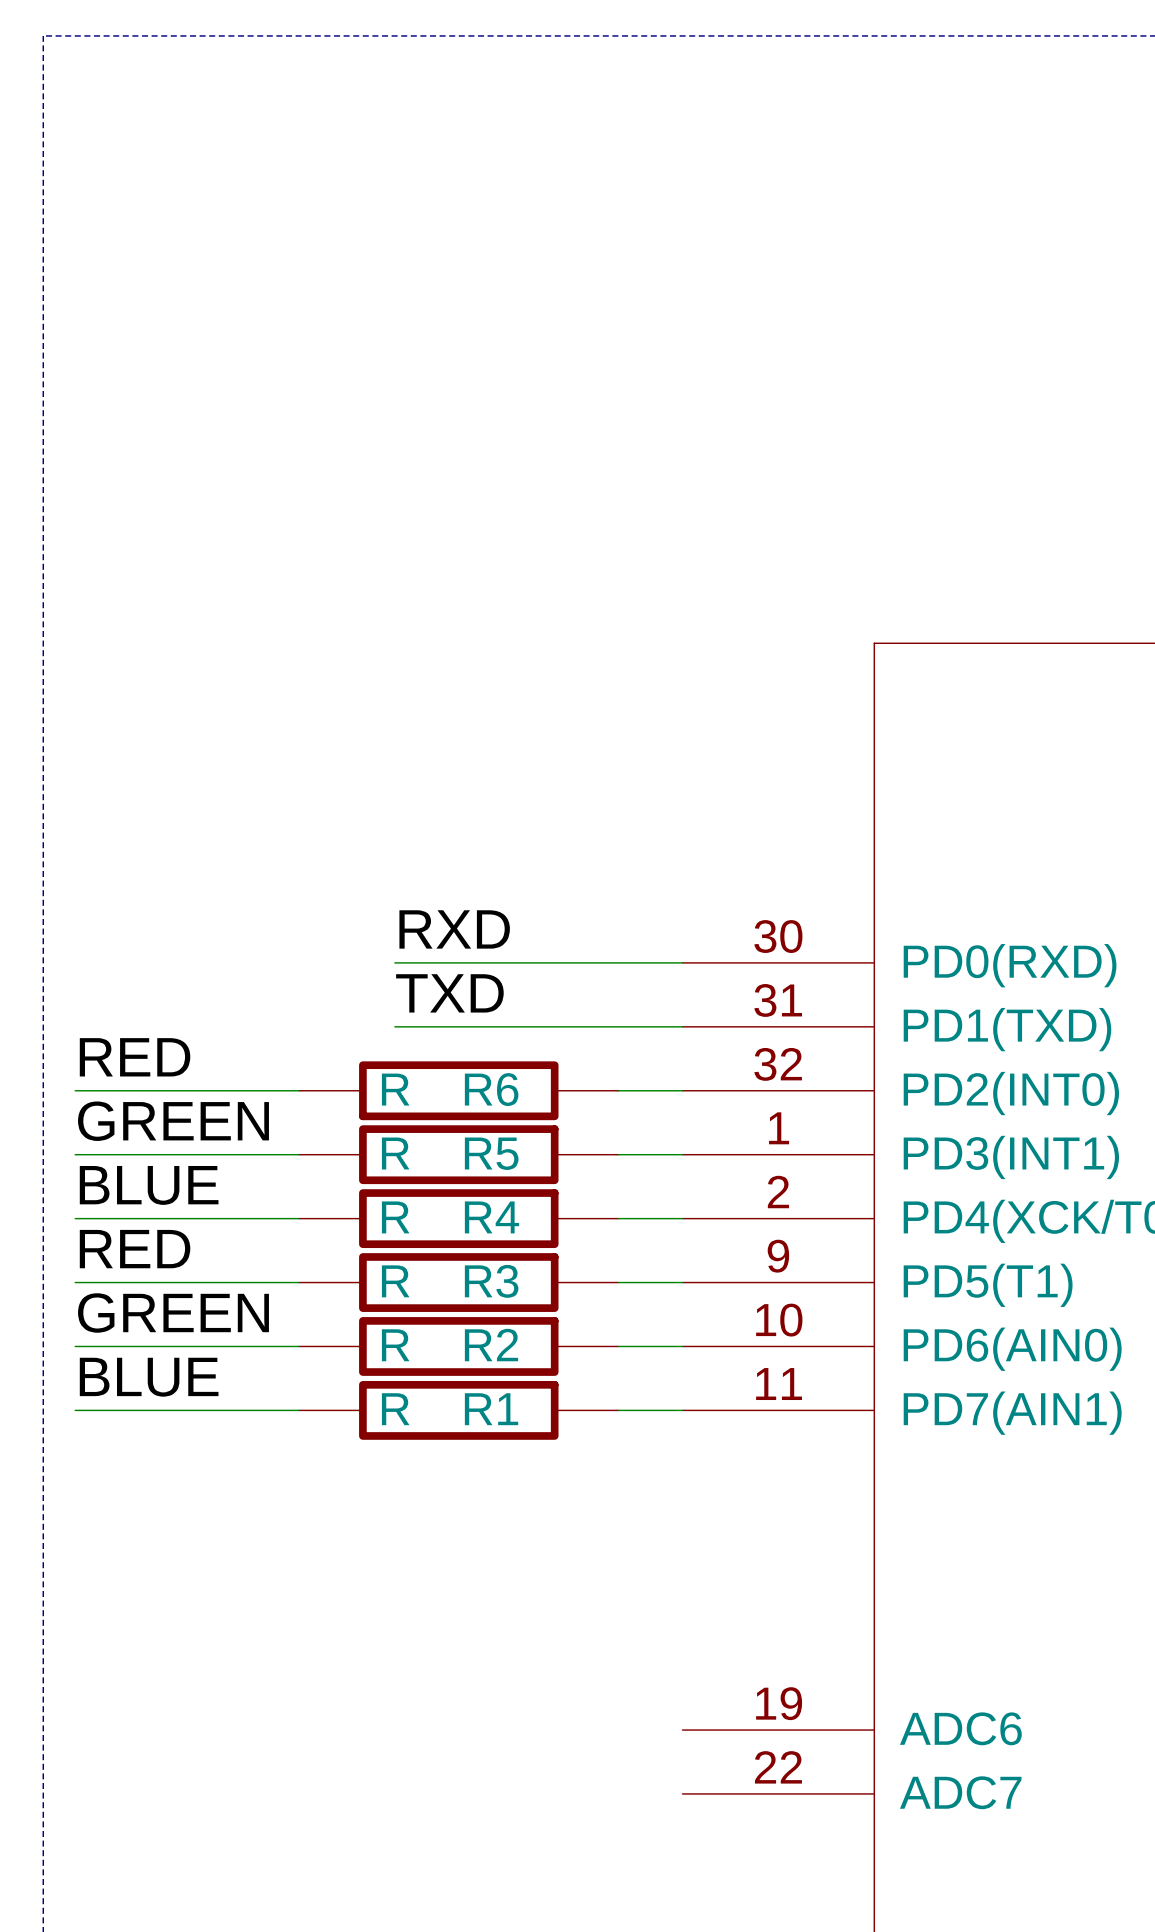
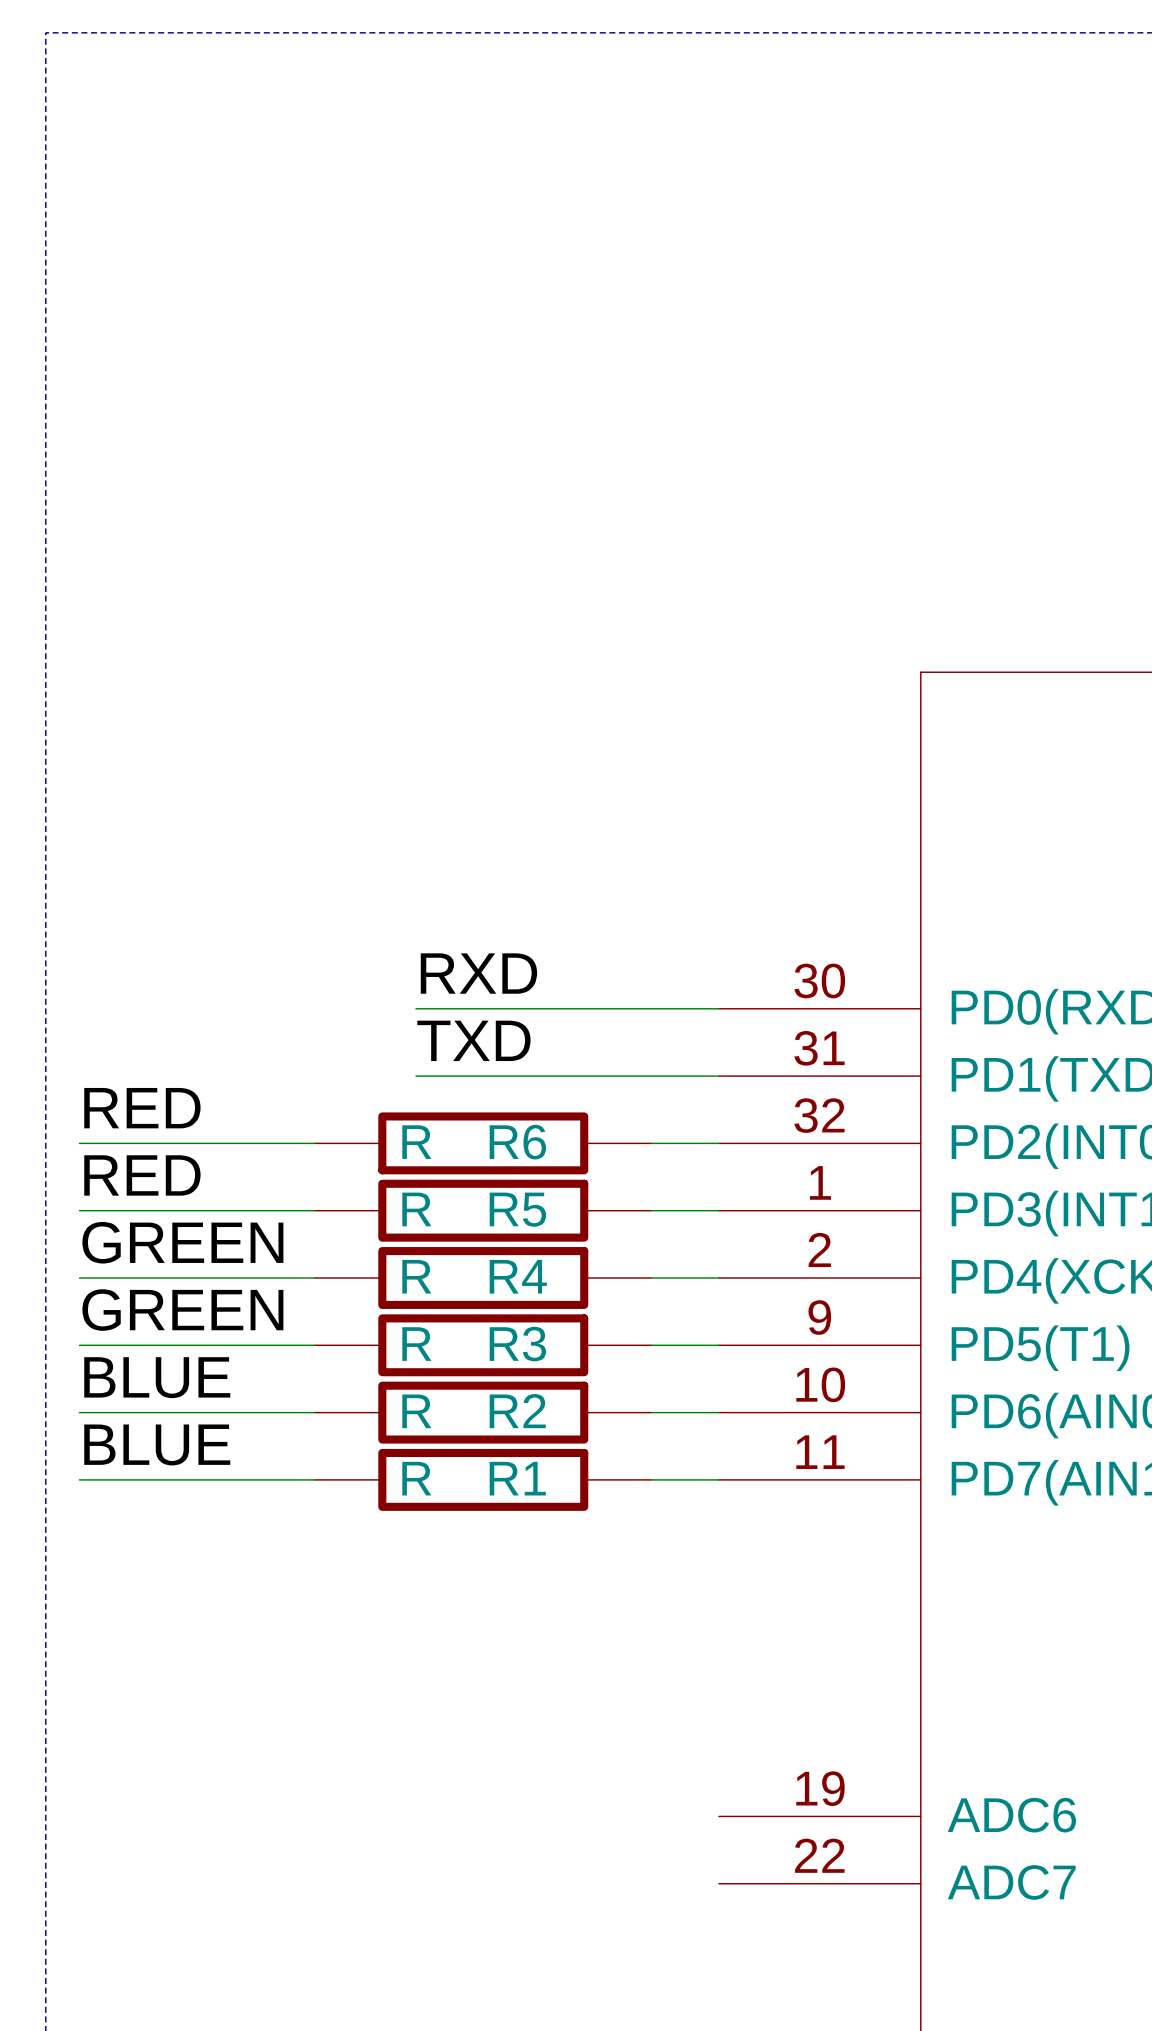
label: GREEN (173, 1121) -> RED (142, 1175)
label: BLUE (149, 1185) -> GREEN (182, 1242)
label: RED (135, 1249) -> GREEN (182, 1310)
label: GREEN (173, 1313) -> BLUE (157, 1377)

